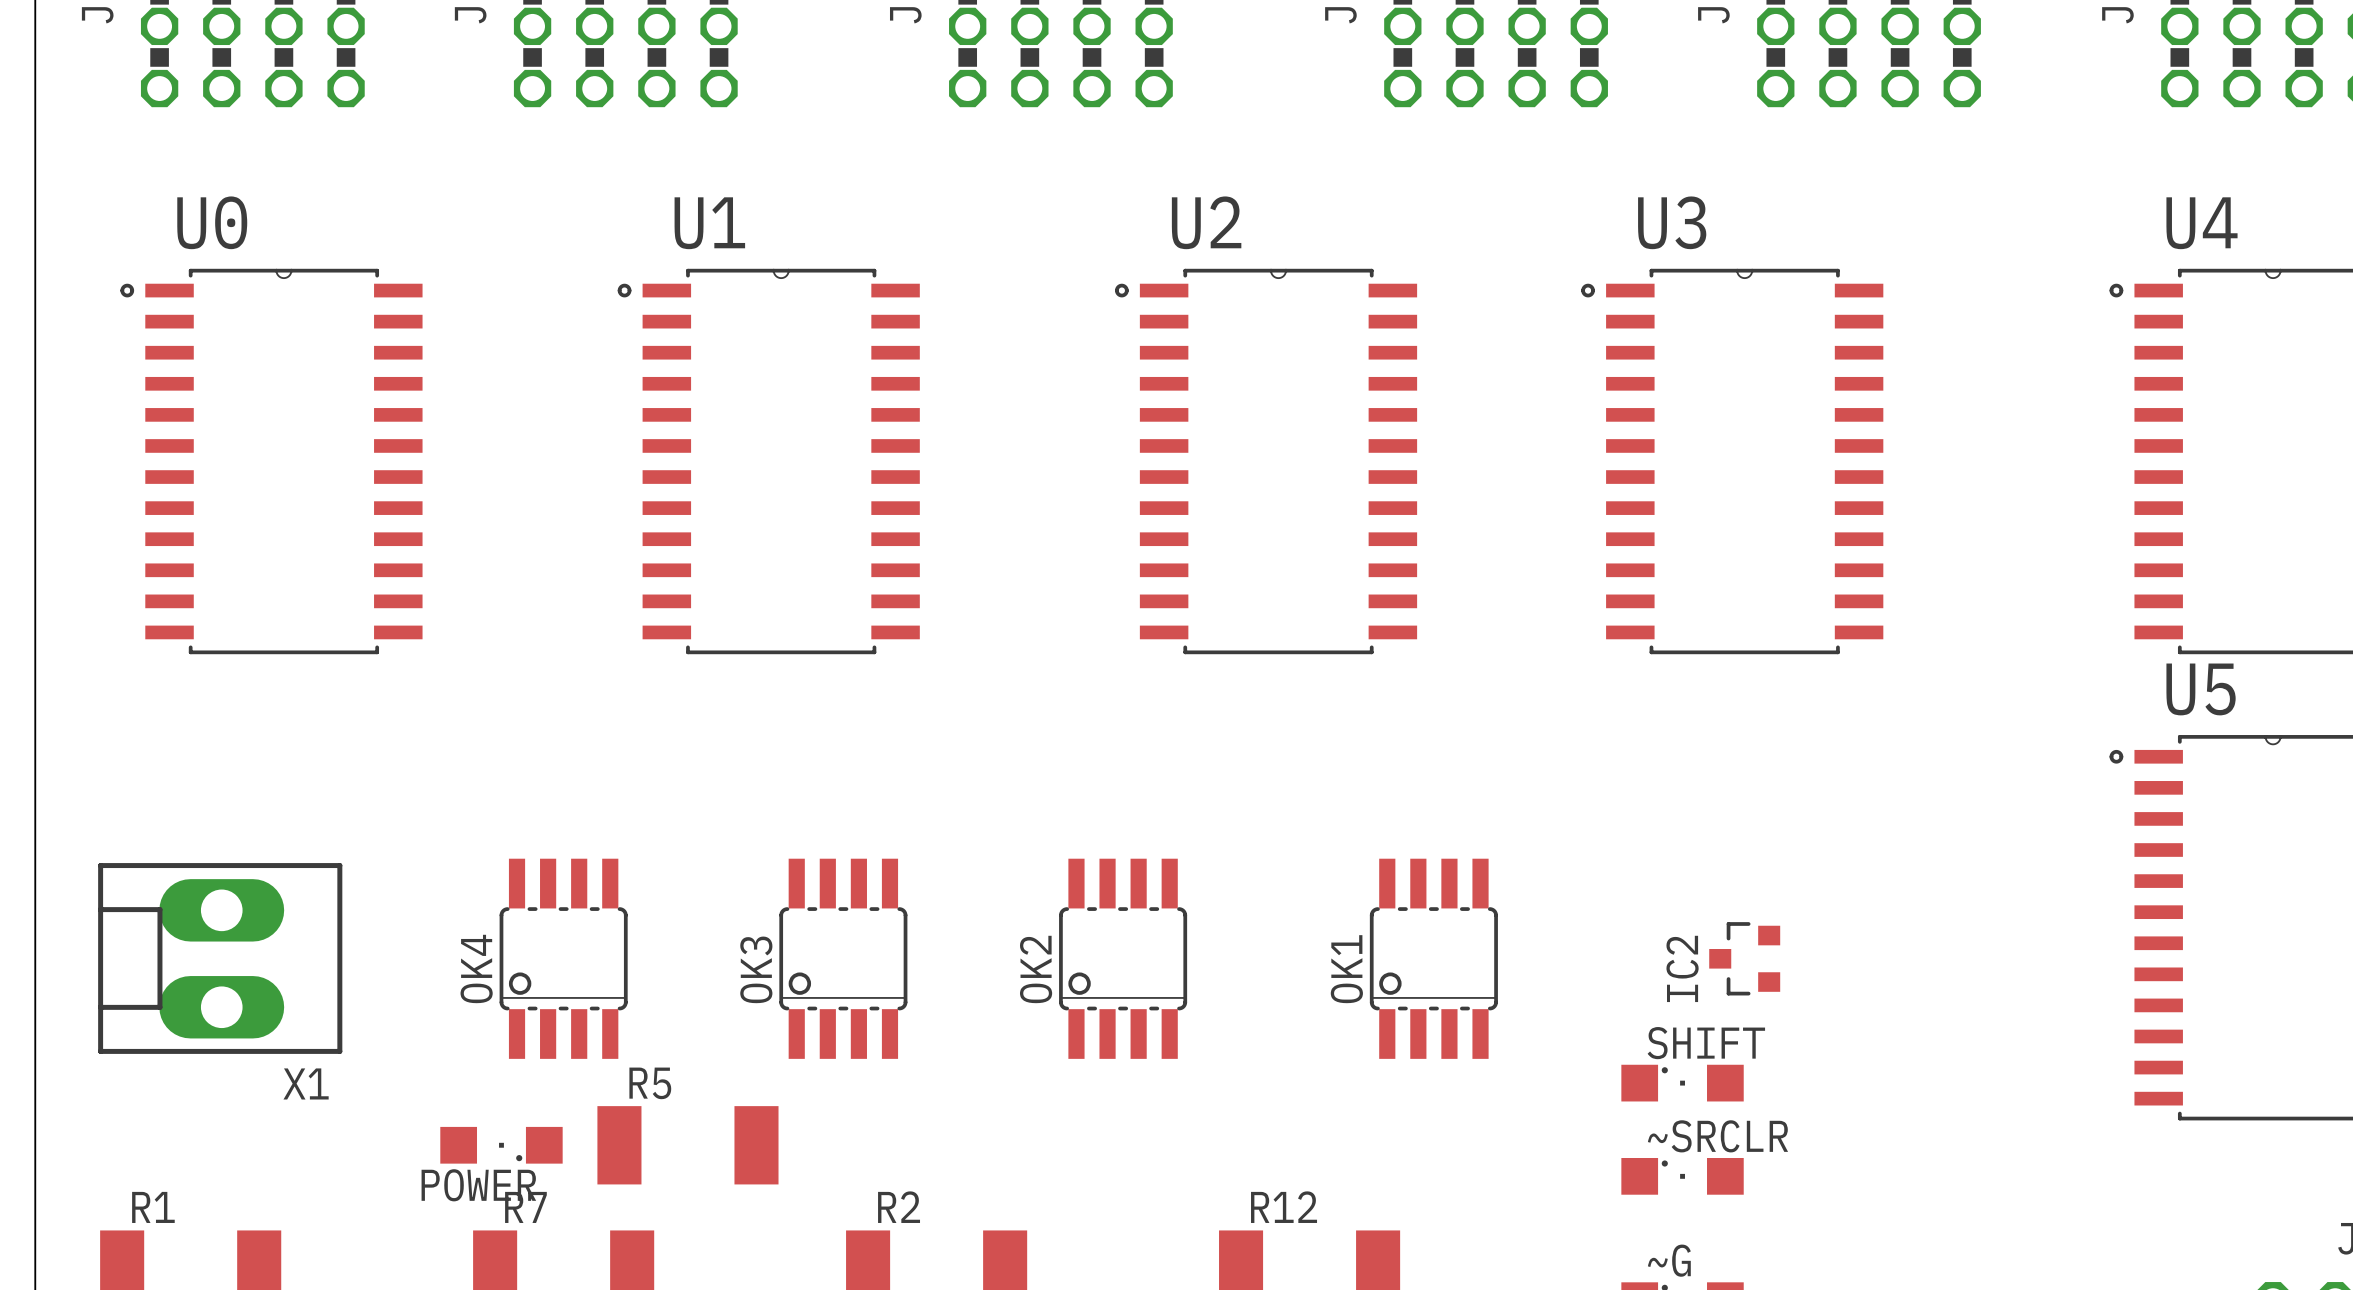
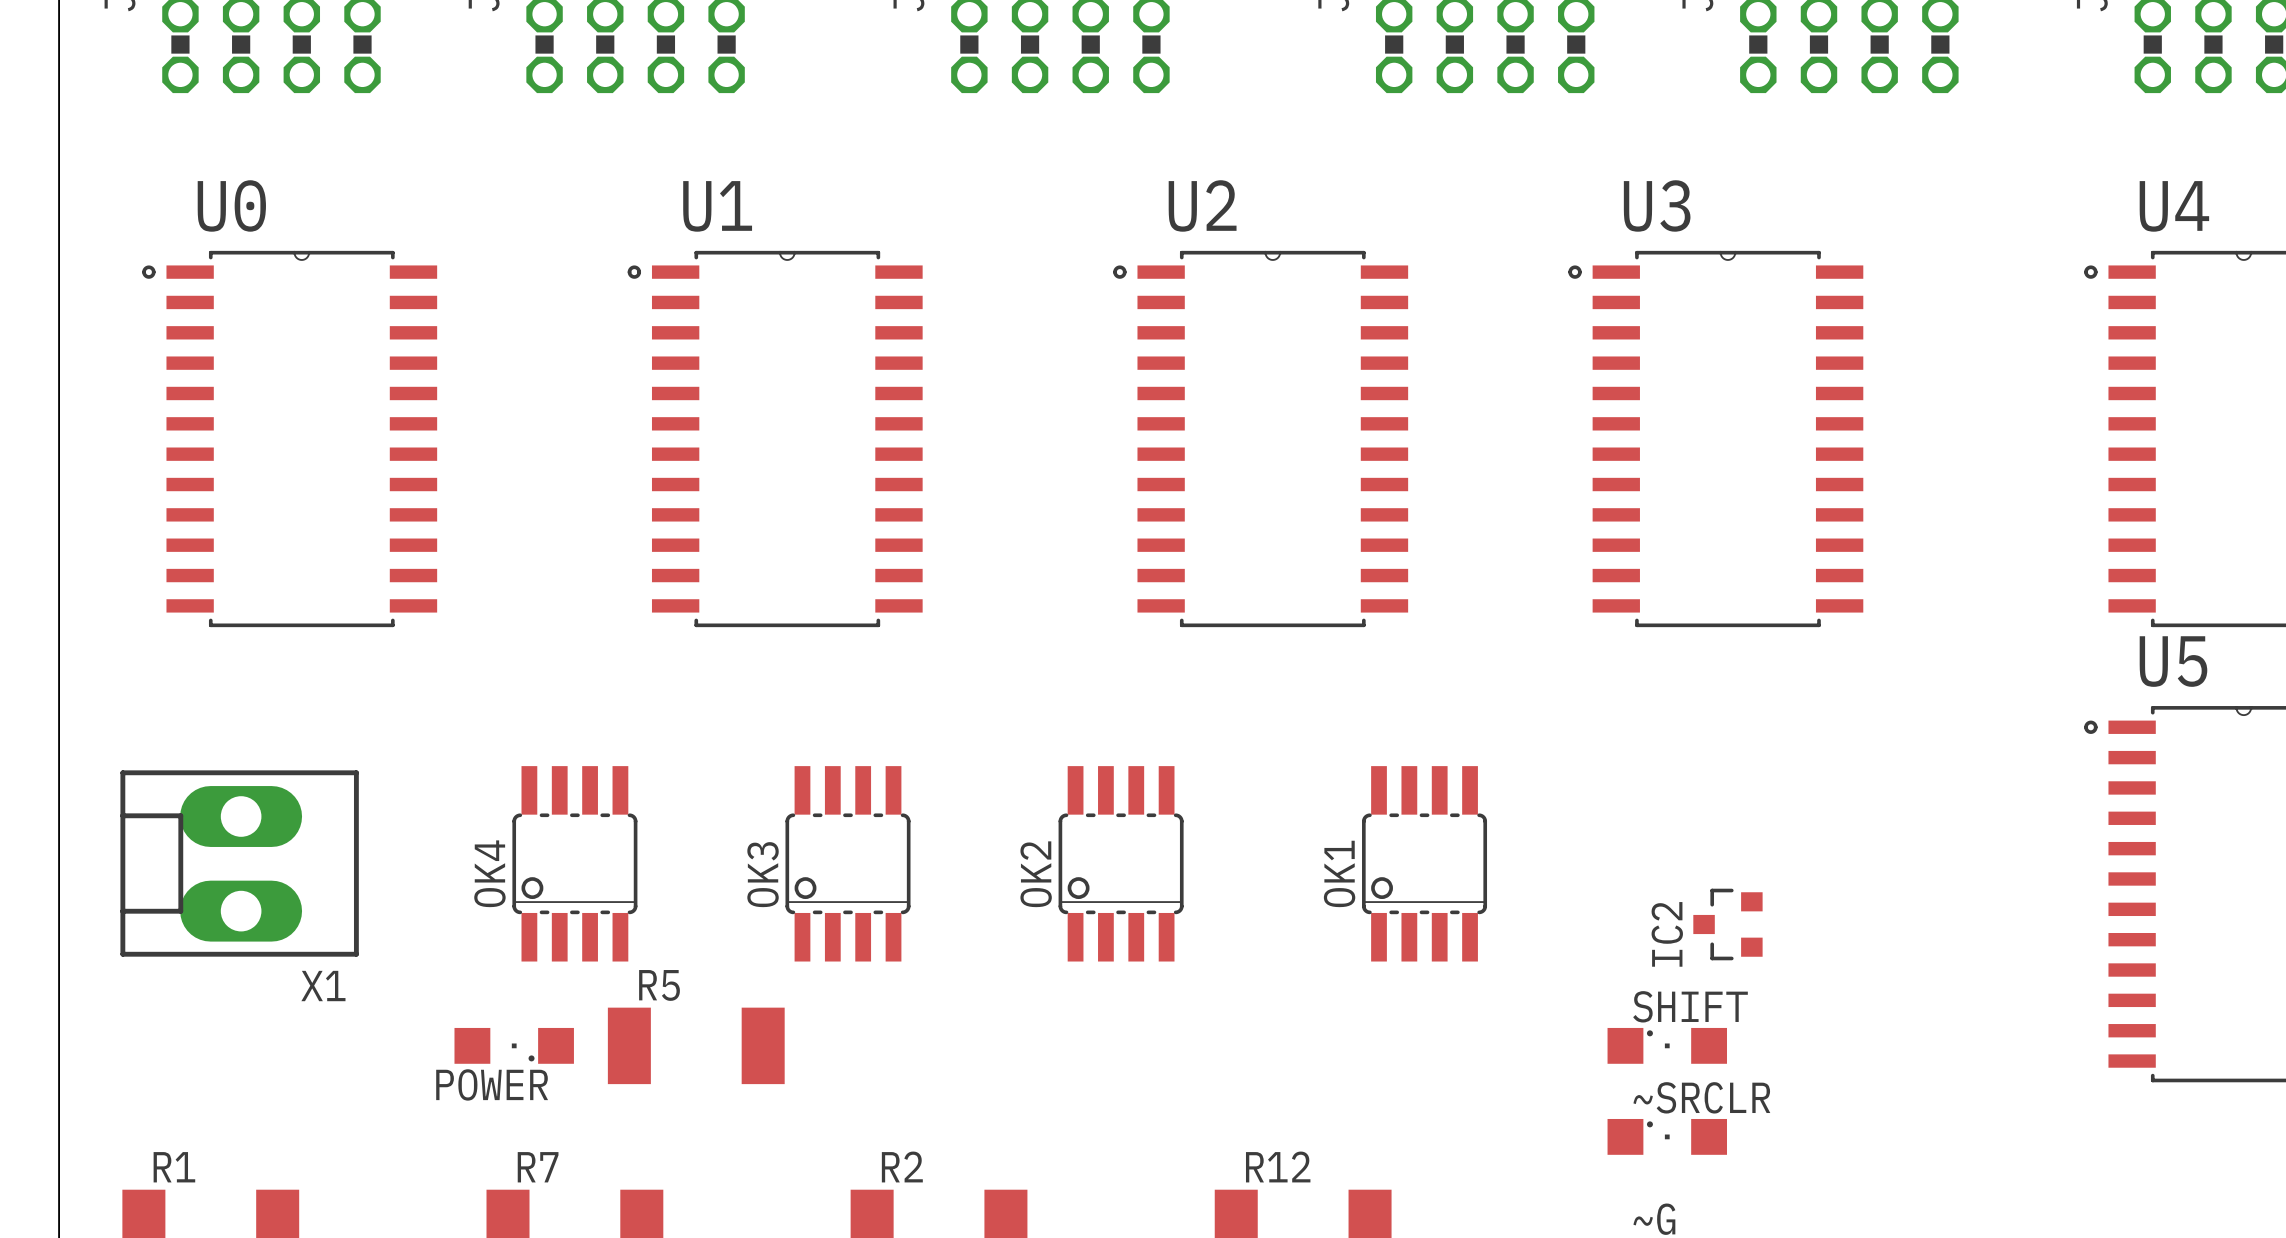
X1 position: (220, 958) -> (239, 863)
OK4 position: (563, 958) -> (574, 863)
OK3 position: (843, 958) -> (847, 863)
OK2 position: (1123, 958) -> (1121, 863)
OK1 position: (1433, 958) -> (1424, 863)
POWER position: (501, 1145) -> (514, 1045)
R5 position: (687, 1145) -> (696, 1045)

